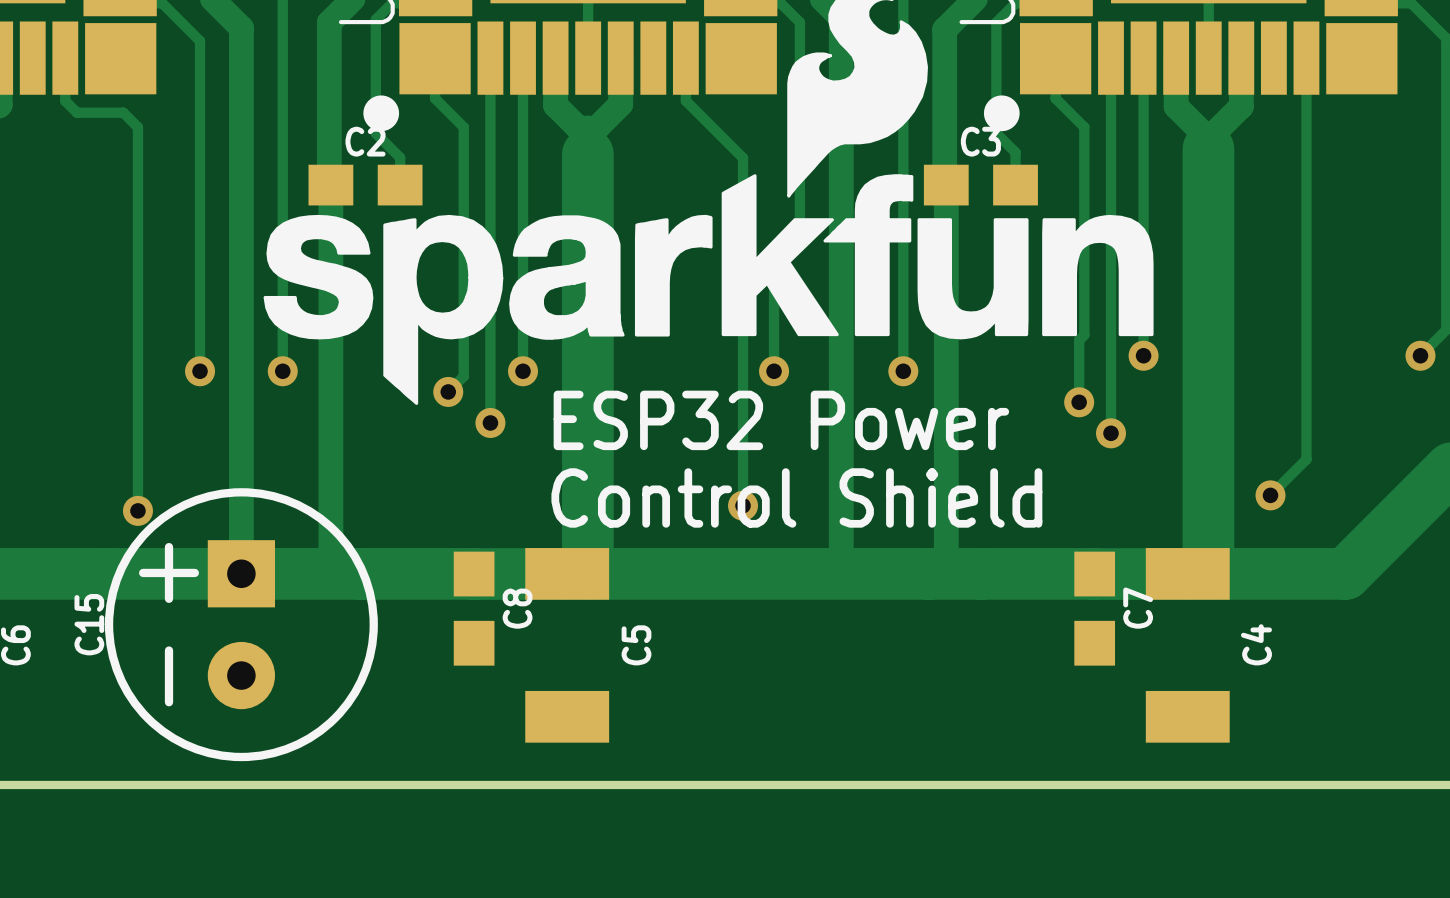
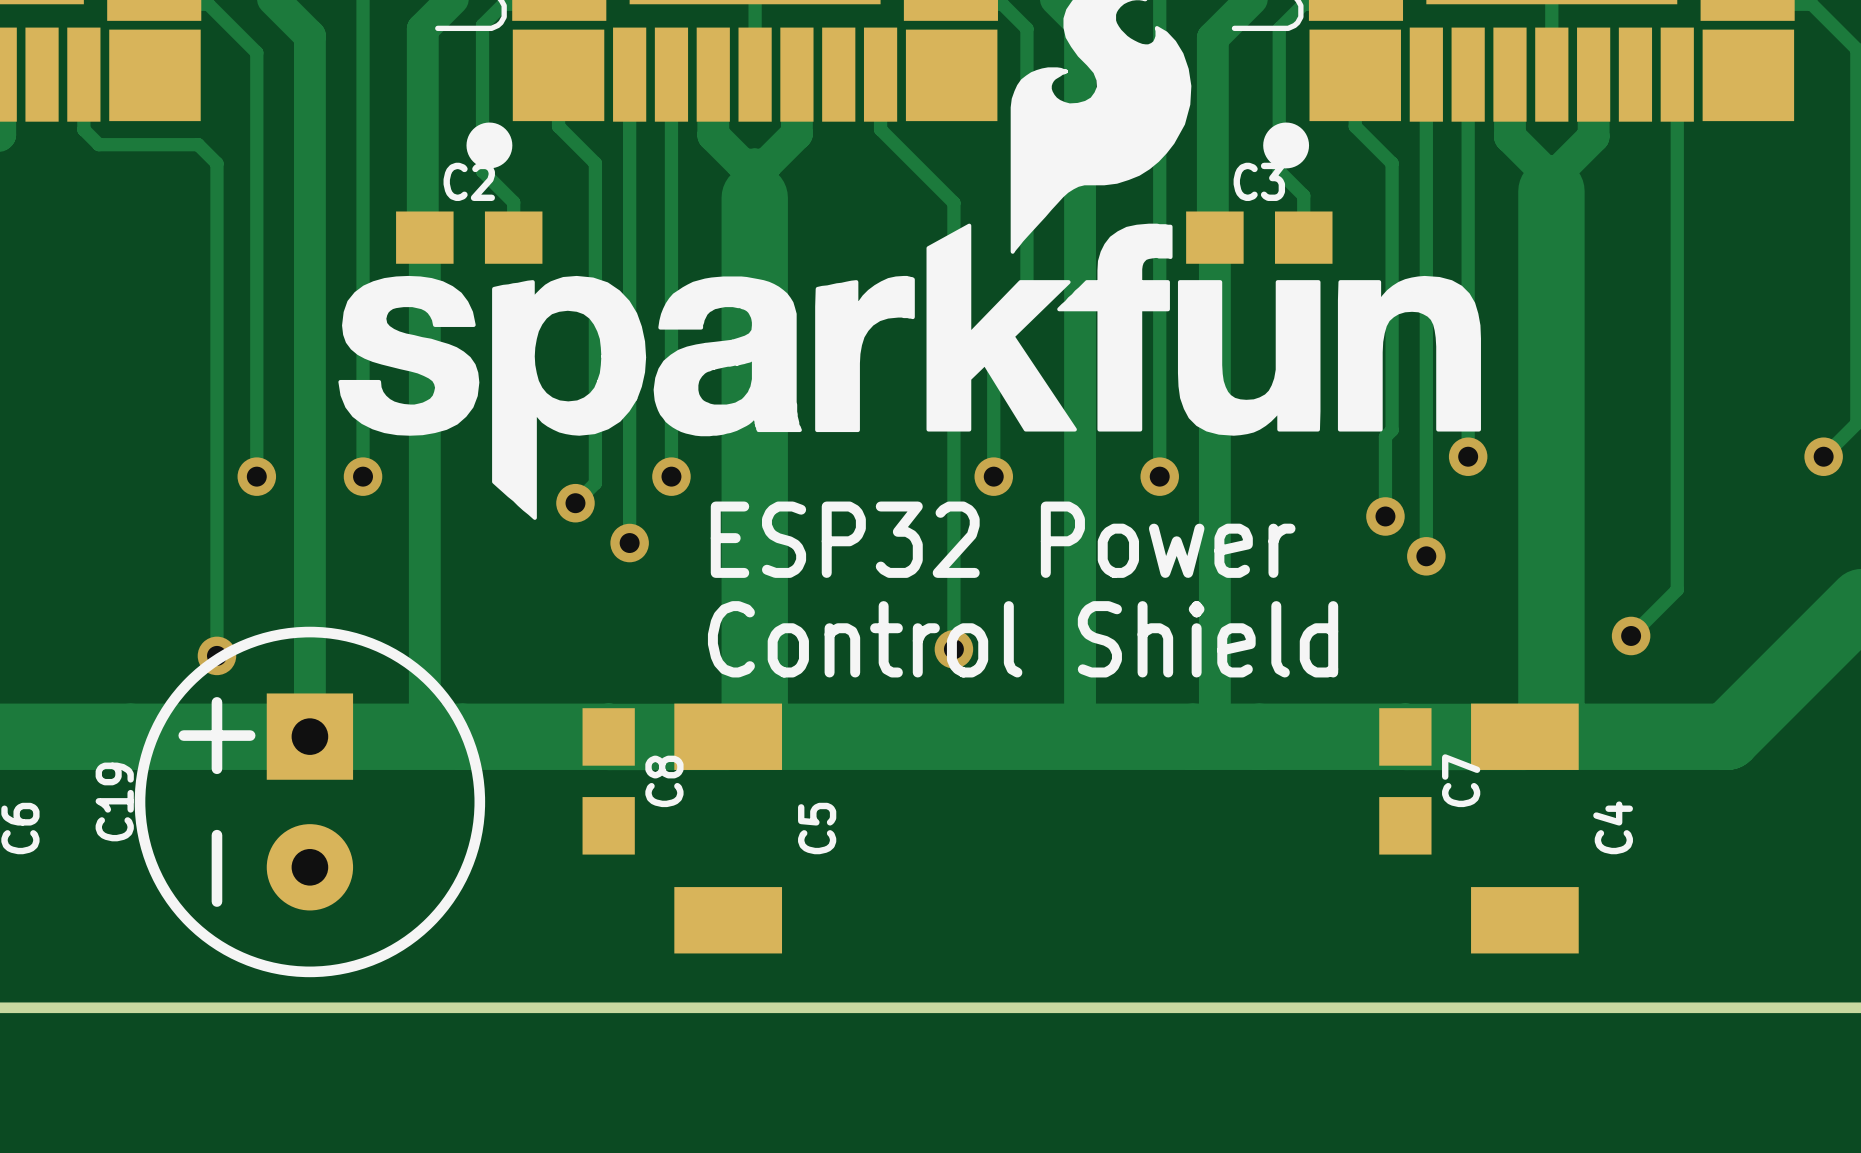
track: (123, 112) (137, 127) (137, 510) -> (158, 144) (198, 144) (216, 163) (216, 655)
via position: (137, 510) -> (216, 655)
C15 name: C15 (89, 624) -> C19 (114, 801)

